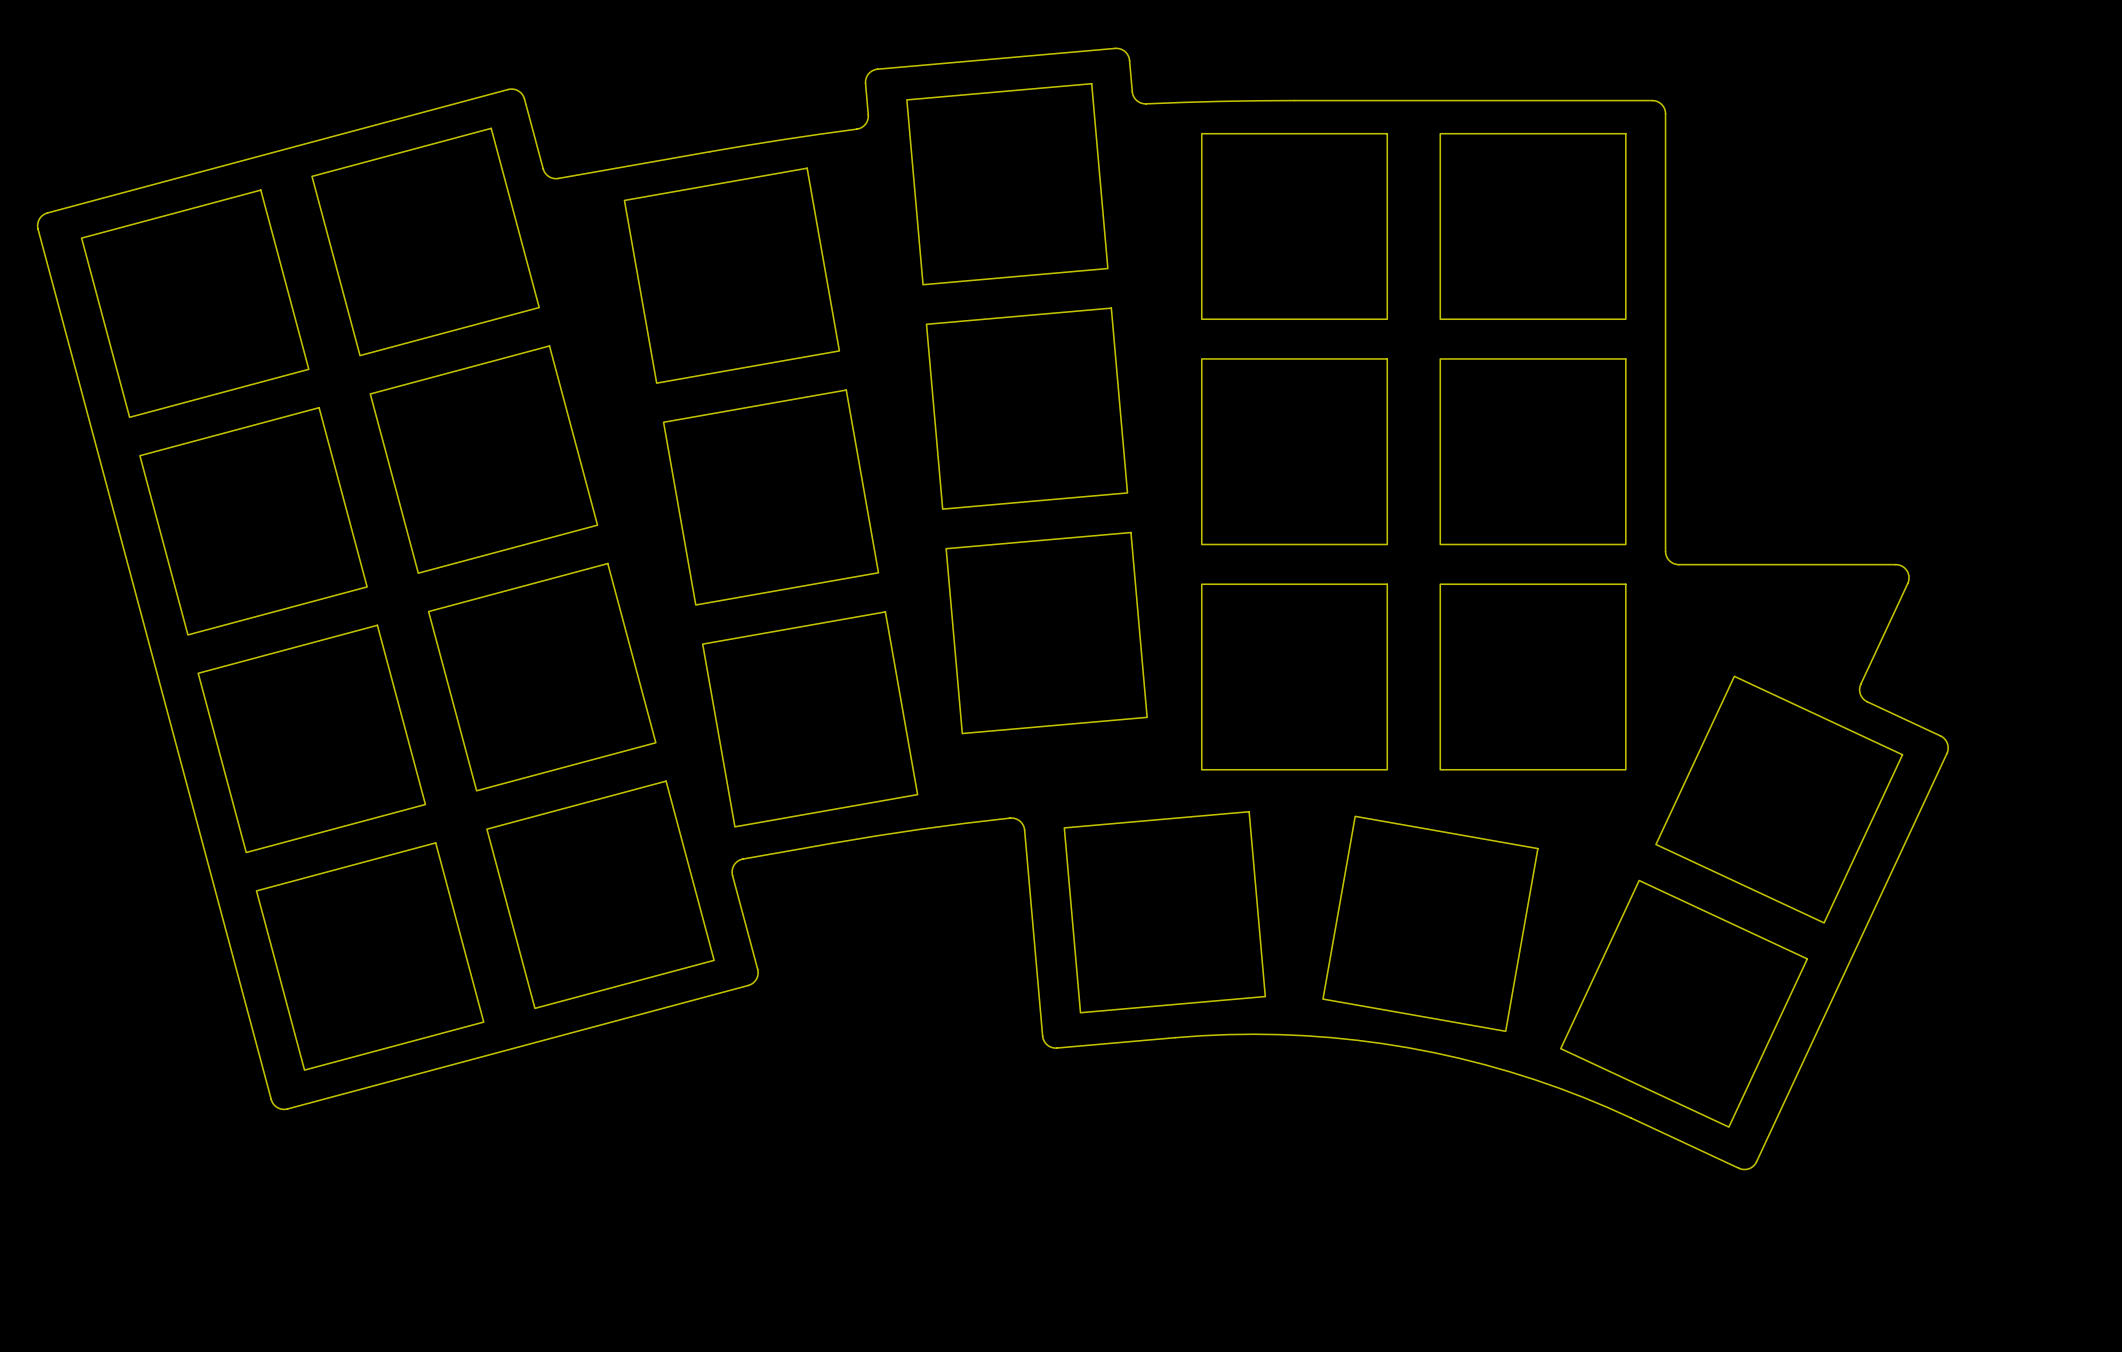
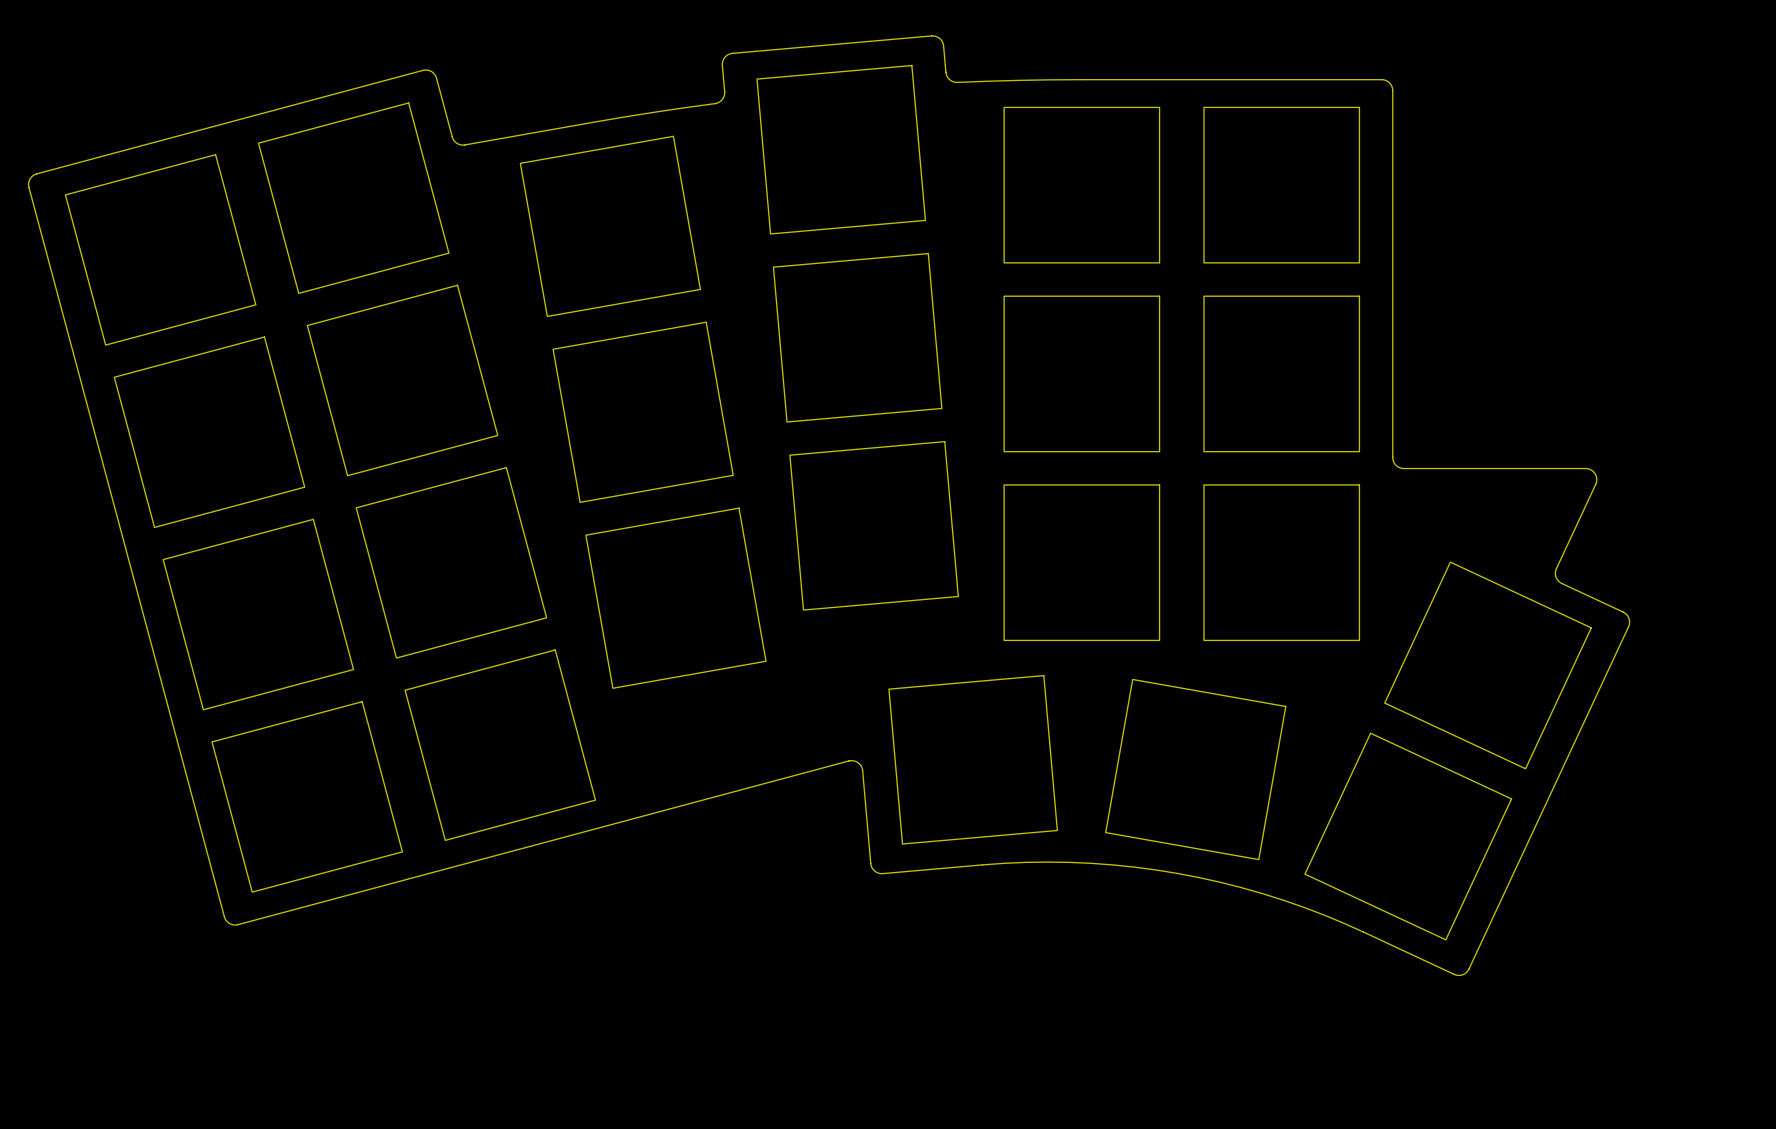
board edge: (1032, 925) (1024, 828) (1020, 822) (1014, 818) (920, 829) (743, 859) (735, 863) (732, 872) (758, 970) (755, 980) (748, 985) -> (862, 770) (857, 762) (848, 761) (624, 821)

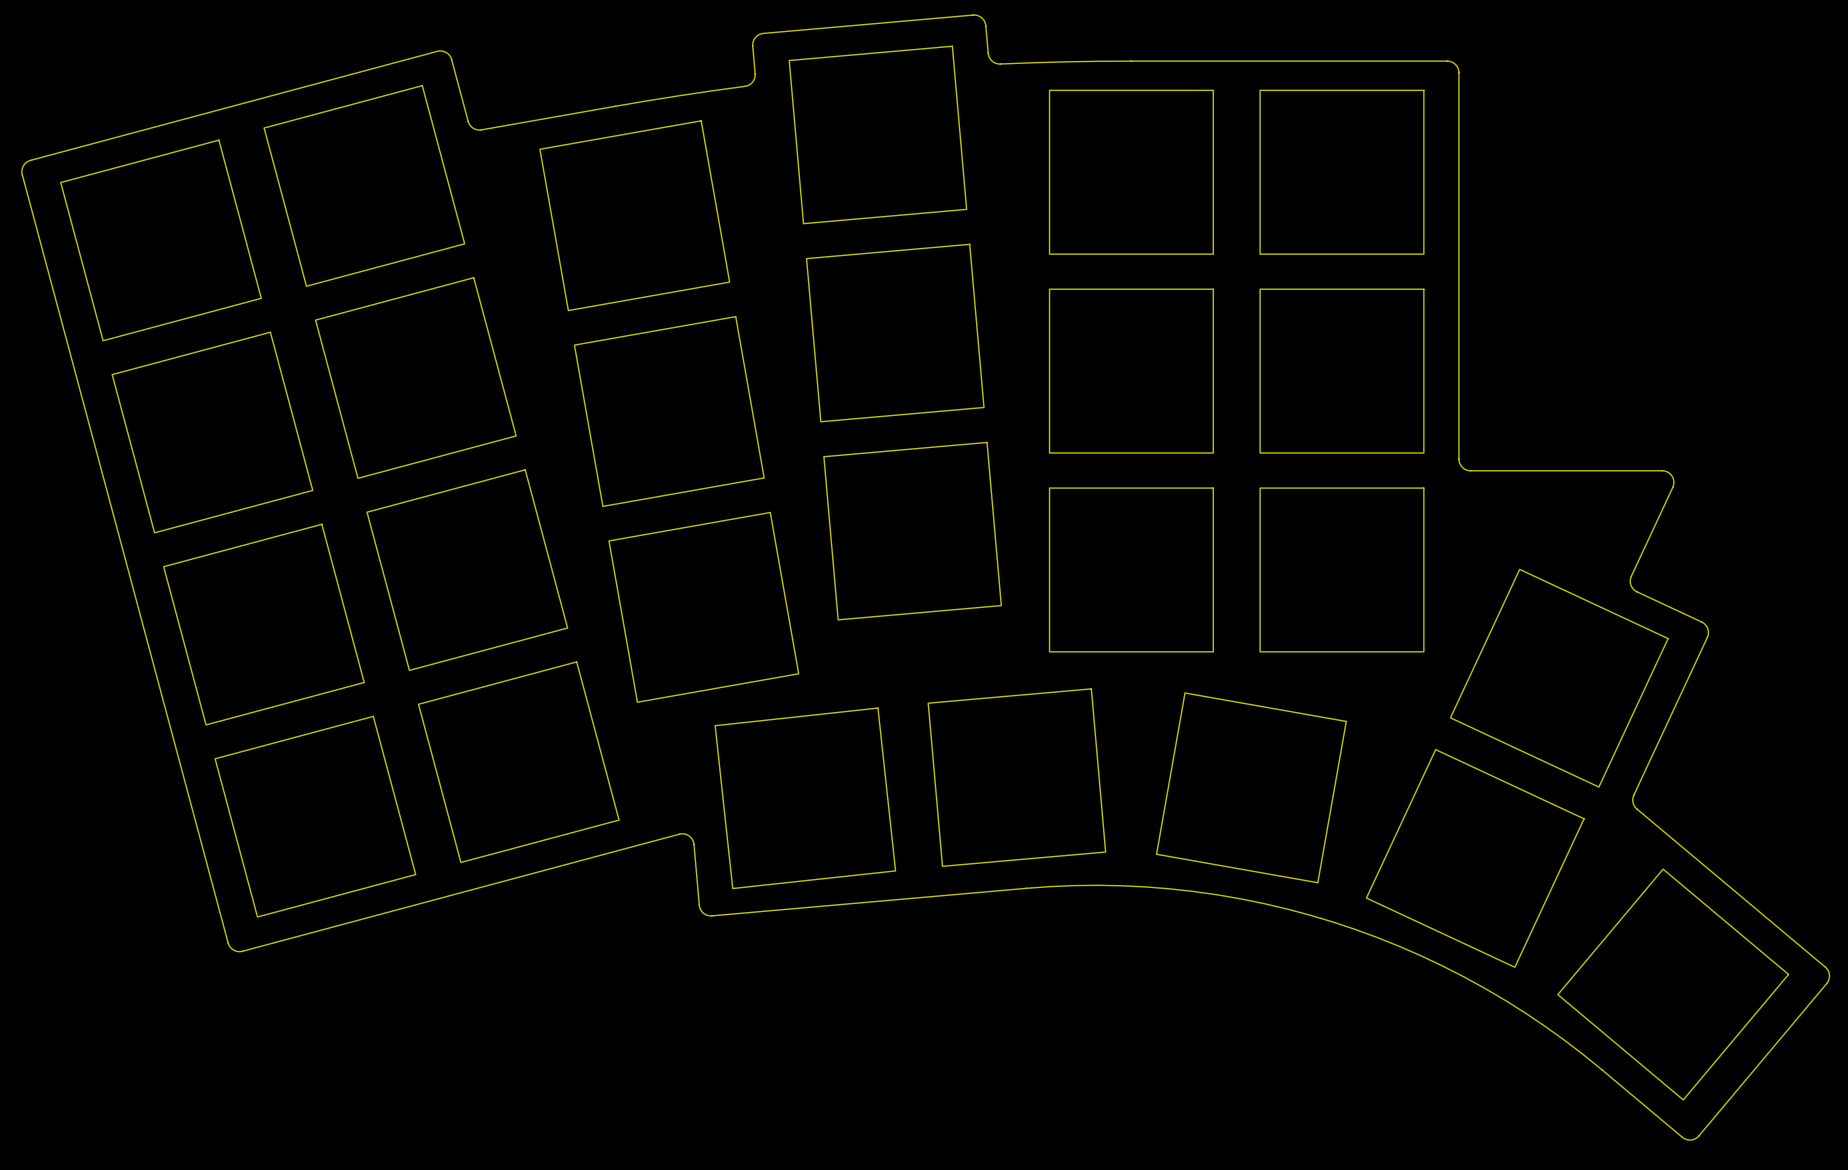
drawing: none -> [714, 707, 897, 890]
board edge: (1558, 776) (1468, 969) (1460, 975) (1454, 974) (1323, 914) (1262, 893) (1220, 882) (1155, 869) (1091, 863) (1047, 862) (982, 864) -> (1633, 795) (1633, 802) (1636, 809) (1825, 967) (1829, 973) (1826, 983) (1698, 1135) (1692, 1139) (1682, 1137) (1583, 1054) (1525, 1013) (1442, 965) (1377, 937) (1286, 908) (1192, 891) (1121, 885) (1026, 888)
board edge: (652, 813) (854, 760) (859, 763) (862, 769) (870, 864) (874, 871) (882, 873) -> (679, 834) (687, 835) (693, 841) (699, 906) (702, 912) (707, 915) (921, 897)
drawing: none -> [1557, 868, 1790, 1101]

